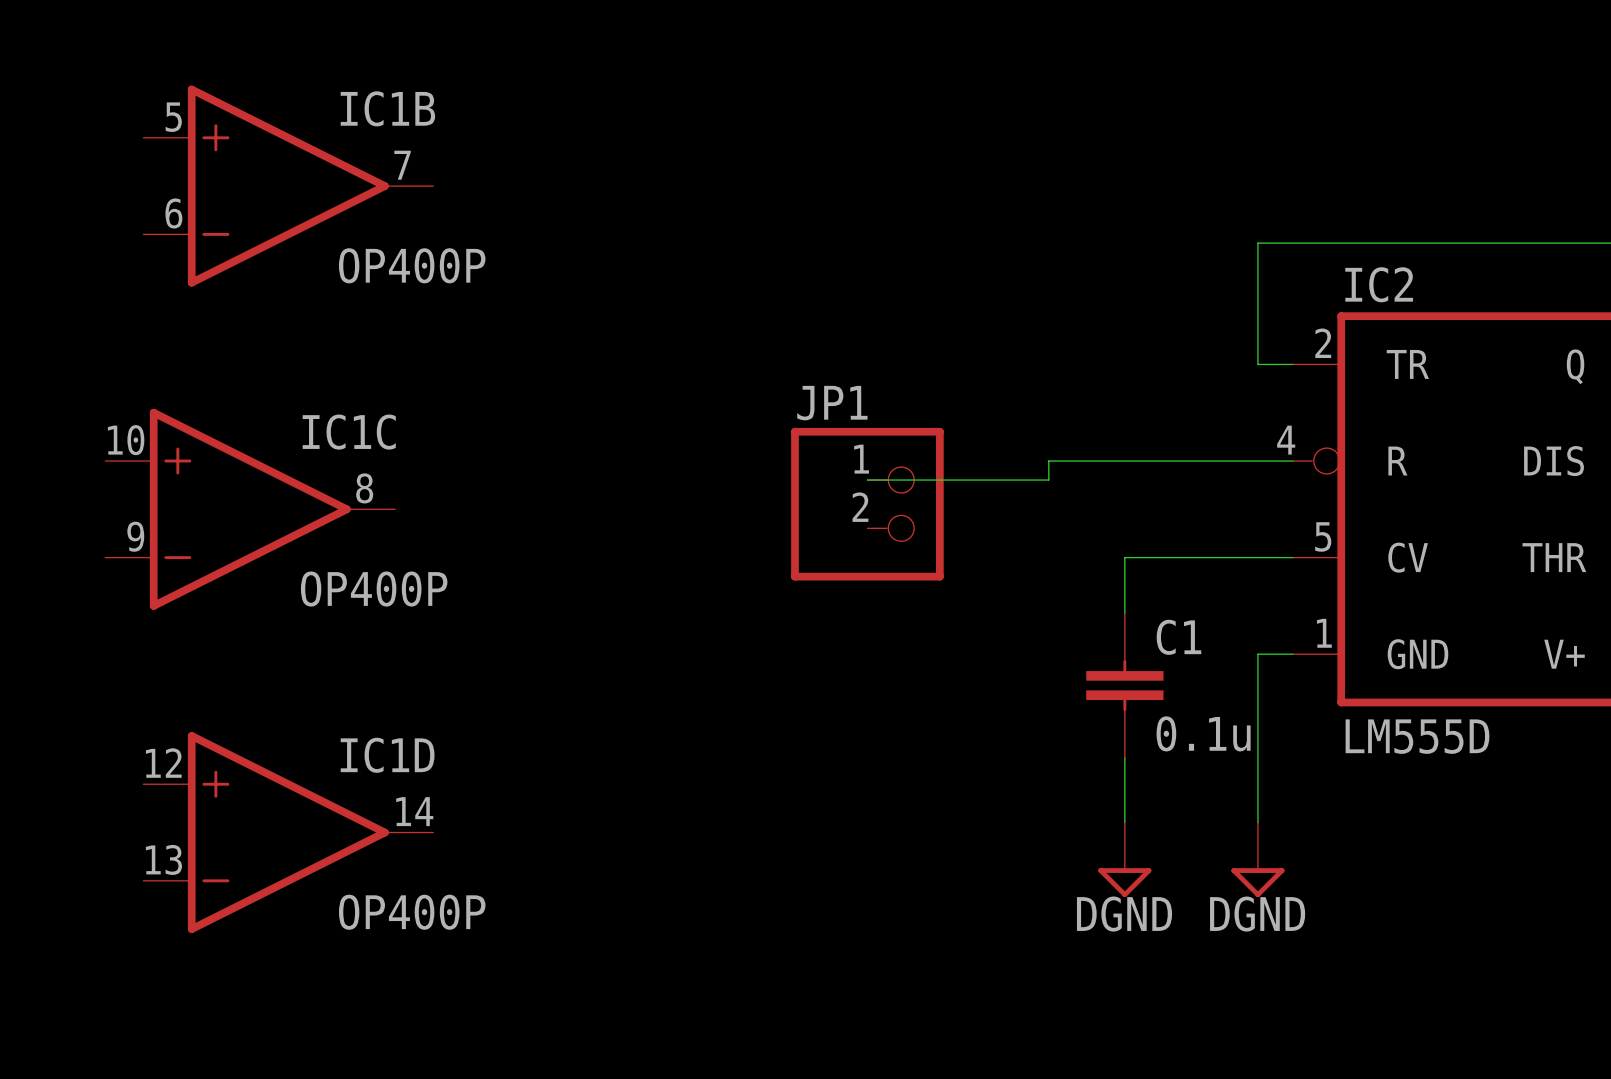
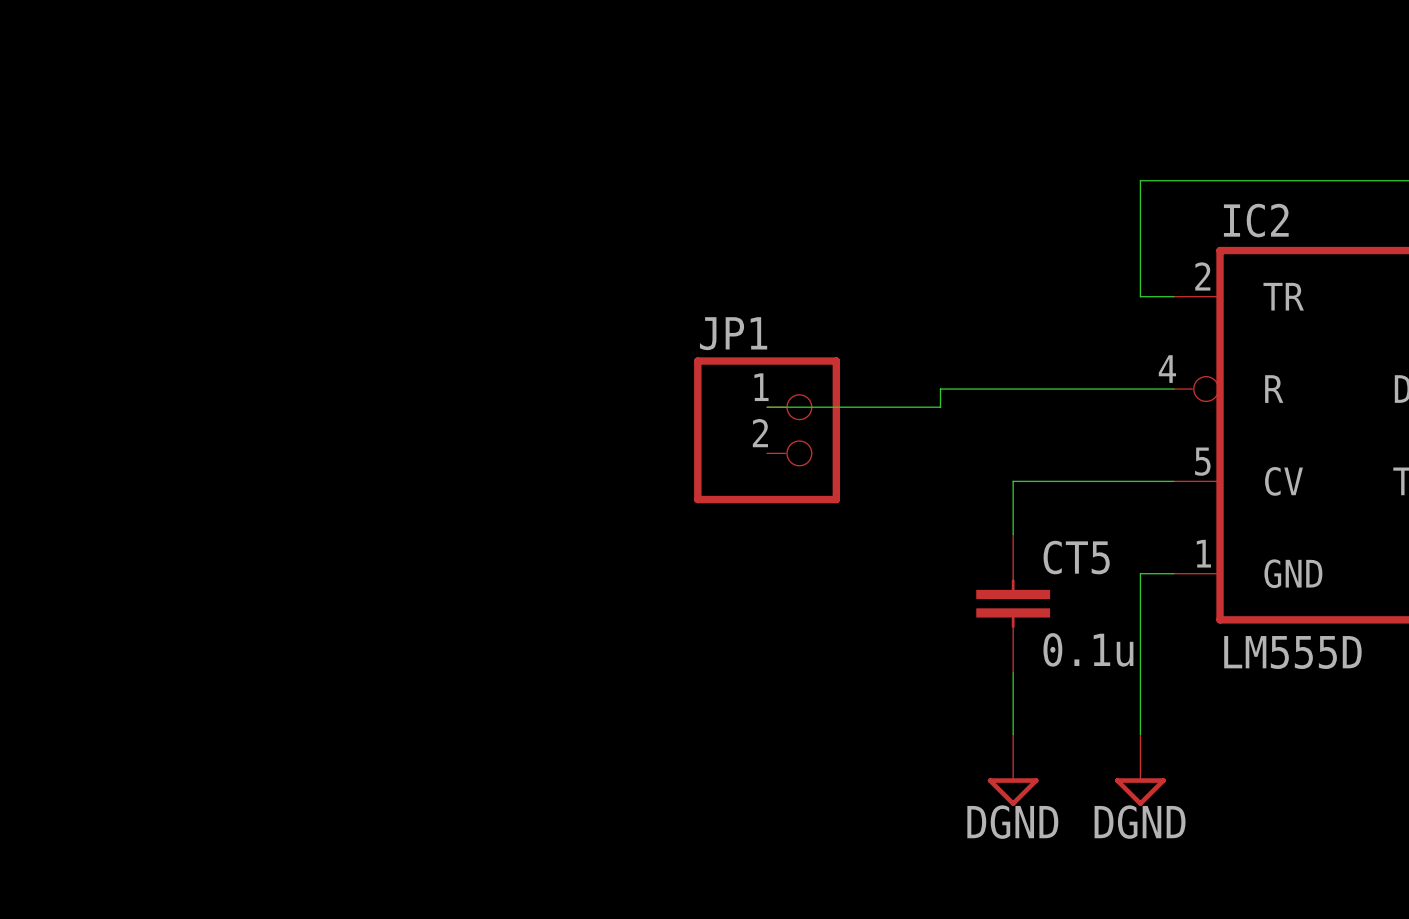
IC1B: OP400P (288, 186) -> none
IC1C: OP400P (250, 509) -> none
C1 name: C1 (1178, 637) -> CT5 (1076, 557)
IC1D: OP400P (288, 832) -> none

